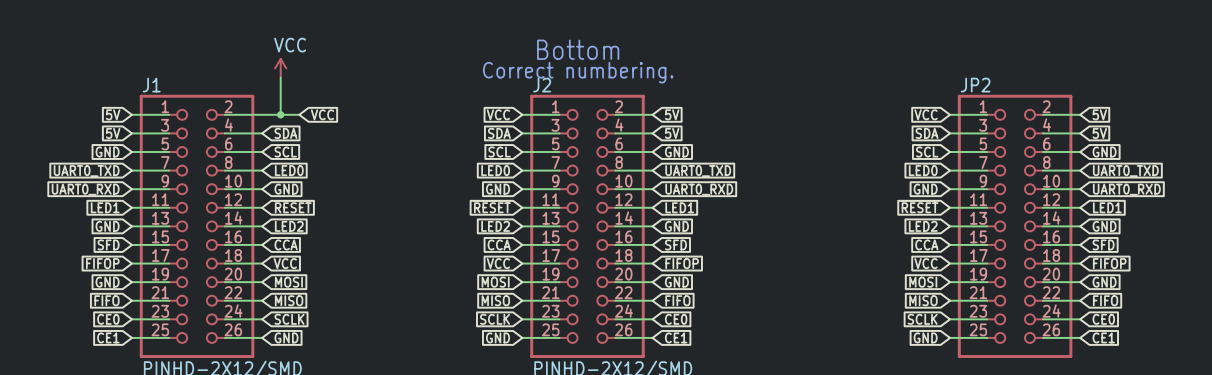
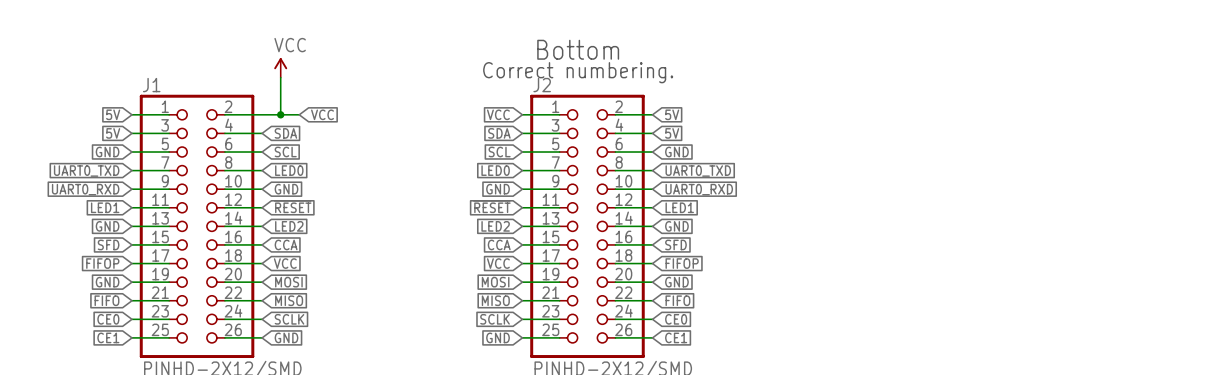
global label: VCC (926, 114) -> none
wire: (950, 114) (987, 114) -> none
wire: (1042, 114) (1080, 114) -> none
global label: 5V (1099, 114) -> none
global label: SDA (927, 133) -> none
wire: (950, 133) (987, 133) -> none
wire: (1042, 133) (1080, 133) -> none
global label: 5V (1099, 133) -> none
global label: SCL (927, 152) -> none
wire: (950, 152) (987, 152) -> none
wire: (1042, 152) (1080, 152) -> none
global label: GND (1104, 152) -> none
global label: LED0 (923, 170) -> none
wire: (950, 170) (987, 170) -> none
wire: (1042, 170) (1080, 170) -> none
global label: UART0_TXD (1125, 171) -> none
global label: GND (925, 189) -> none
wire: (950, 189) (987, 189) -> none
wire: (1042, 189) (1080, 189) -> none
global label: UART0_RXD (1126, 189) -> none
global label: ~{RESET} (919, 206) -> none
wire: (950, 207) (987, 207) -> none
wire: (1042, 207) (1080, 207) -> none
global label: LED1 (1107, 207) -> none
global label: LED2 (923, 226) -> none
wire: (950, 226) (987, 226) -> none
JP2: (1015, 226) -> none
wire: (1042, 226) (1080, 226) -> none
global label: GND (1104, 226) -> none
global label: CCA (926, 244) -> none
wire: (950, 244) (987, 244) -> none
wire: (1042, 244) (1080, 244) -> none
global label: SFD (1103, 244) -> none
global label: VCC (926, 263) -> none
wire: (950, 263) (987, 263) -> none
wire: (1042, 263) (1080, 263) -> none
global label: FIFOP (1109, 263) -> none
global label: MOSI (923, 282) -> none
wire: (950, 282) (987, 282) -> none
wire: (1042, 282) (1080, 282) -> none
global label: GND (1104, 282) -> none
global label: MISO (923, 300) -> none
wire: (950, 300) (987, 300) -> none
wire: (1042, 300) (1080, 300) -> none
global label: FIFO (1105, 300) -> none
global label: SCLK (922, 319) -> none
wire: (950, 319) (987, 319) -> none
wire: (1042, 319) (1080, 319) -> none
global label: CE0 (1103, 319) -> none
global label: GND (925, 337) -> none
wire: (950, 337) (987, 337) -> none
wire: (1042, 337) (1080, 337) -> none
global label: CE1 (1103, 337) -> none

